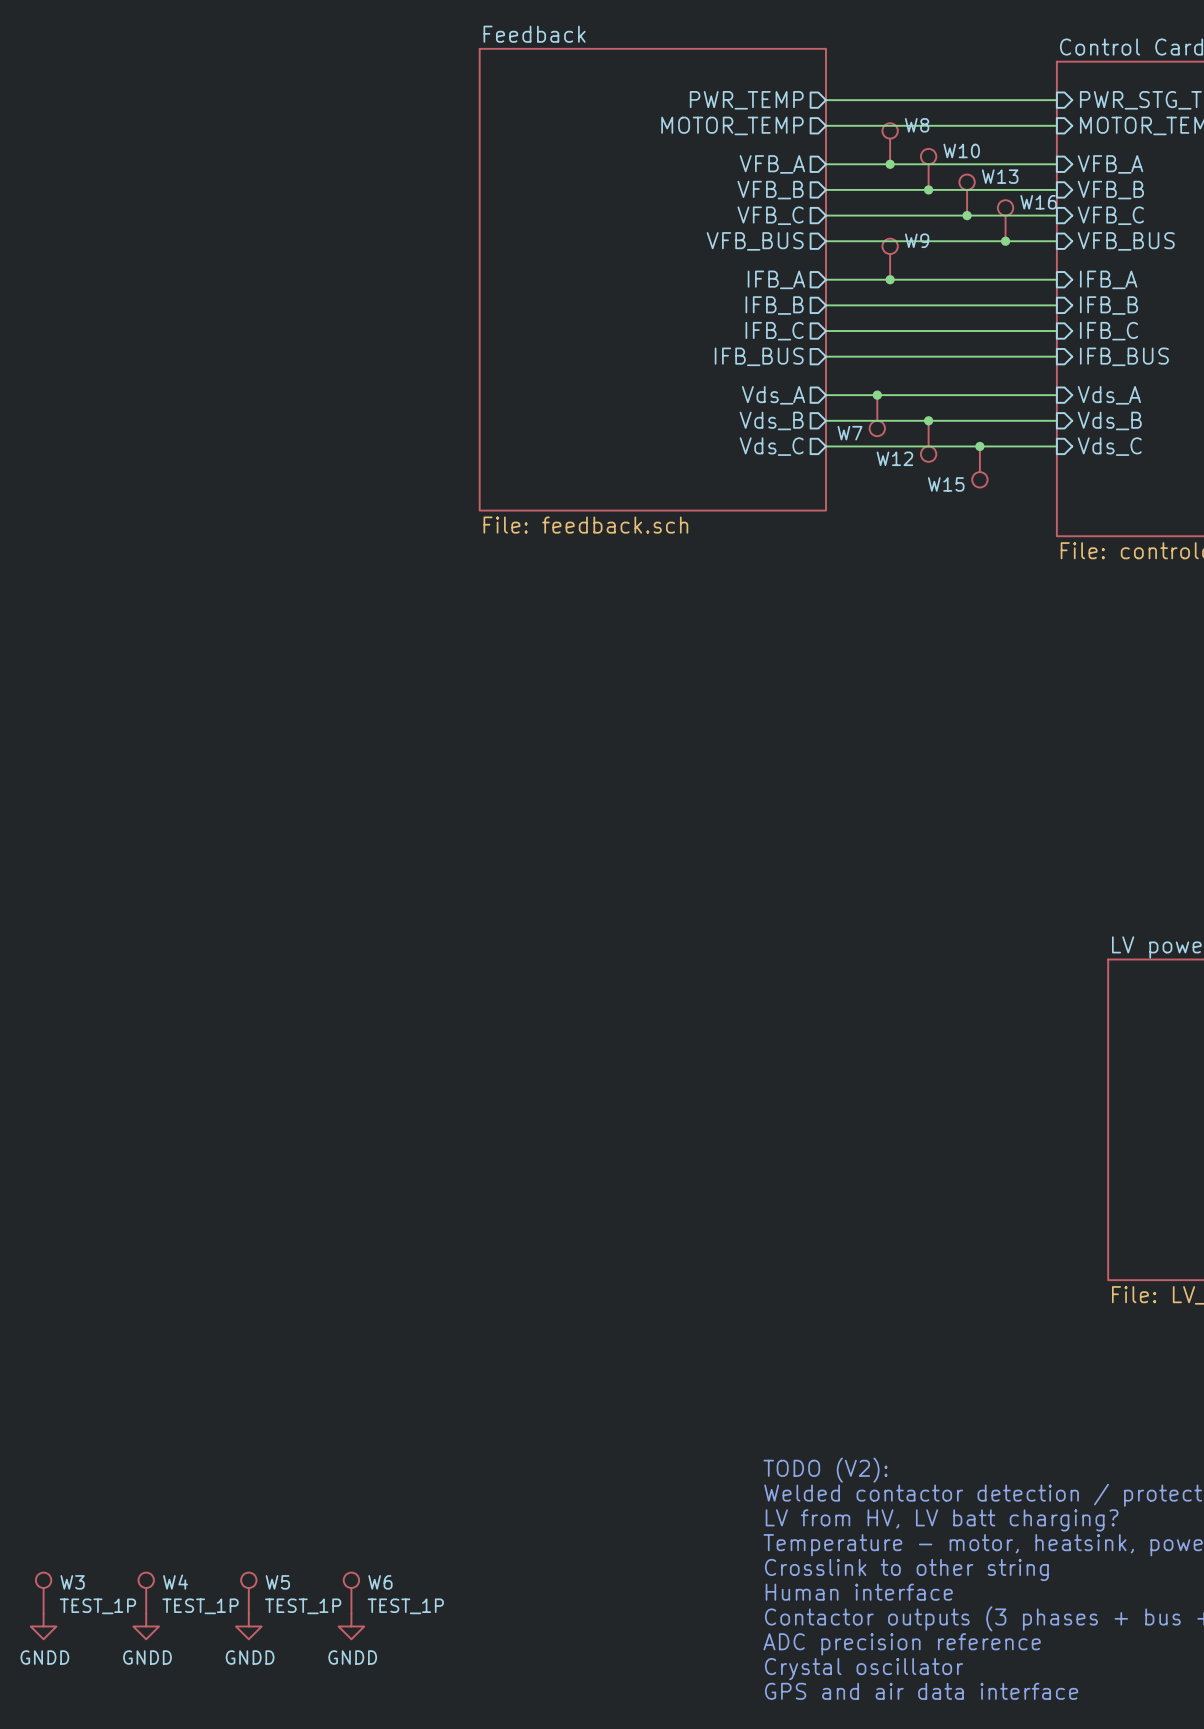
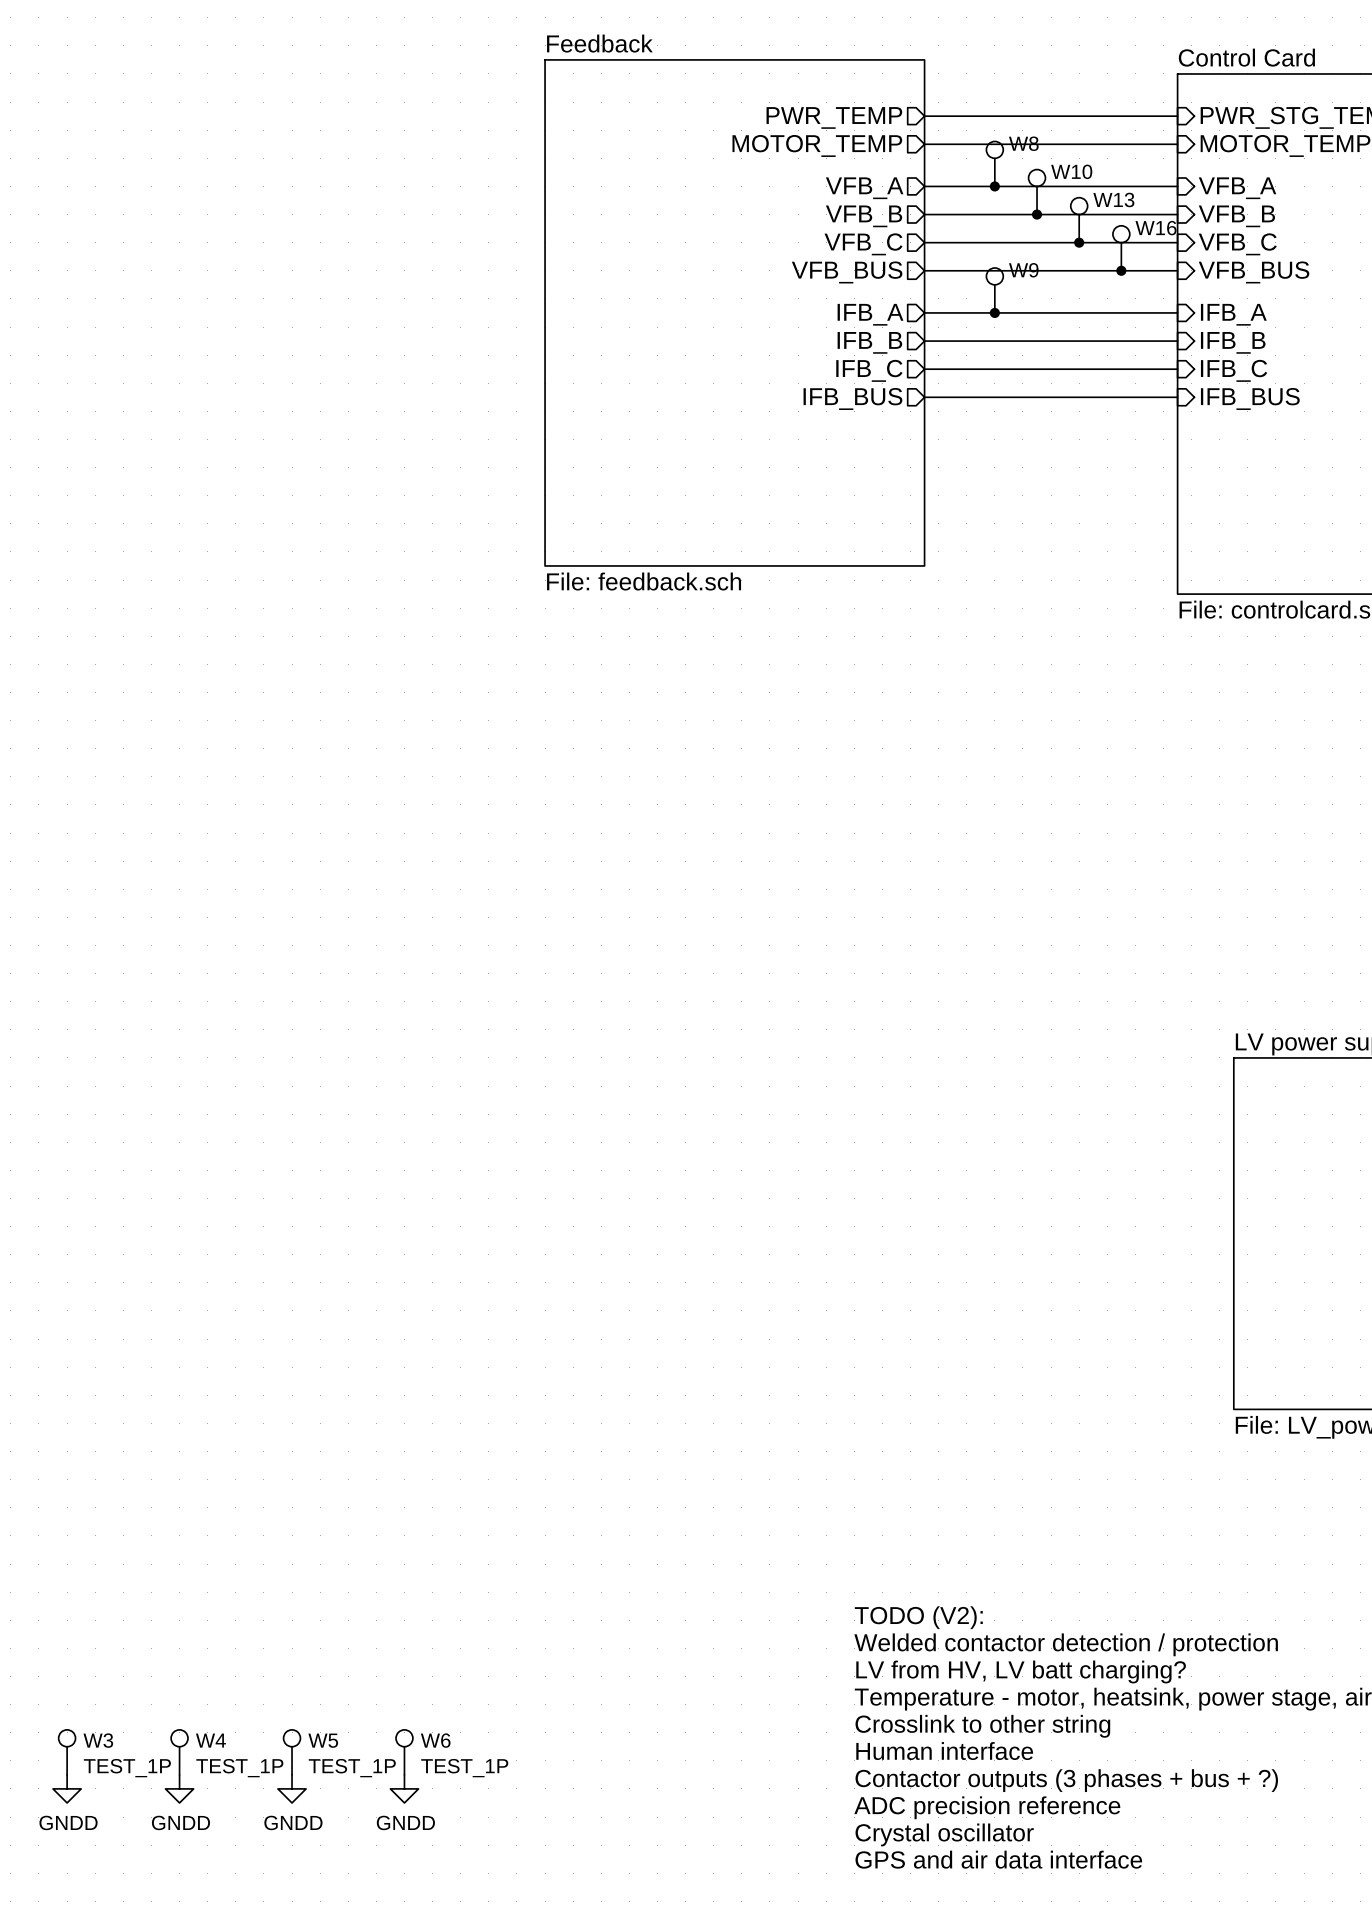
sheet pin: Vds_A (773, 395) -> none
wire: (825, 395) (1056, 395) -> none
junction: (877, 395) -> none
sheet pin: Vds_A (1109, 395) -> none
W7: (877, 415) -> none
sheet pin: Vds_B (771, 420) -> none
wire: (825, 420) (1056, 420) -> none
junction: (928, 420) -> none
sheet pin: Vds_B (1109, 420) -> none
W12: (928, 441) -> none
sheet pin: Vds_C (771, 446) -> none
wire: (825, 446) (1056, 446) -> none
junction: (979, 446) -> none
sheet pin: Vds_C (1109, 446) -> none
W15: (979, 466) -> none

